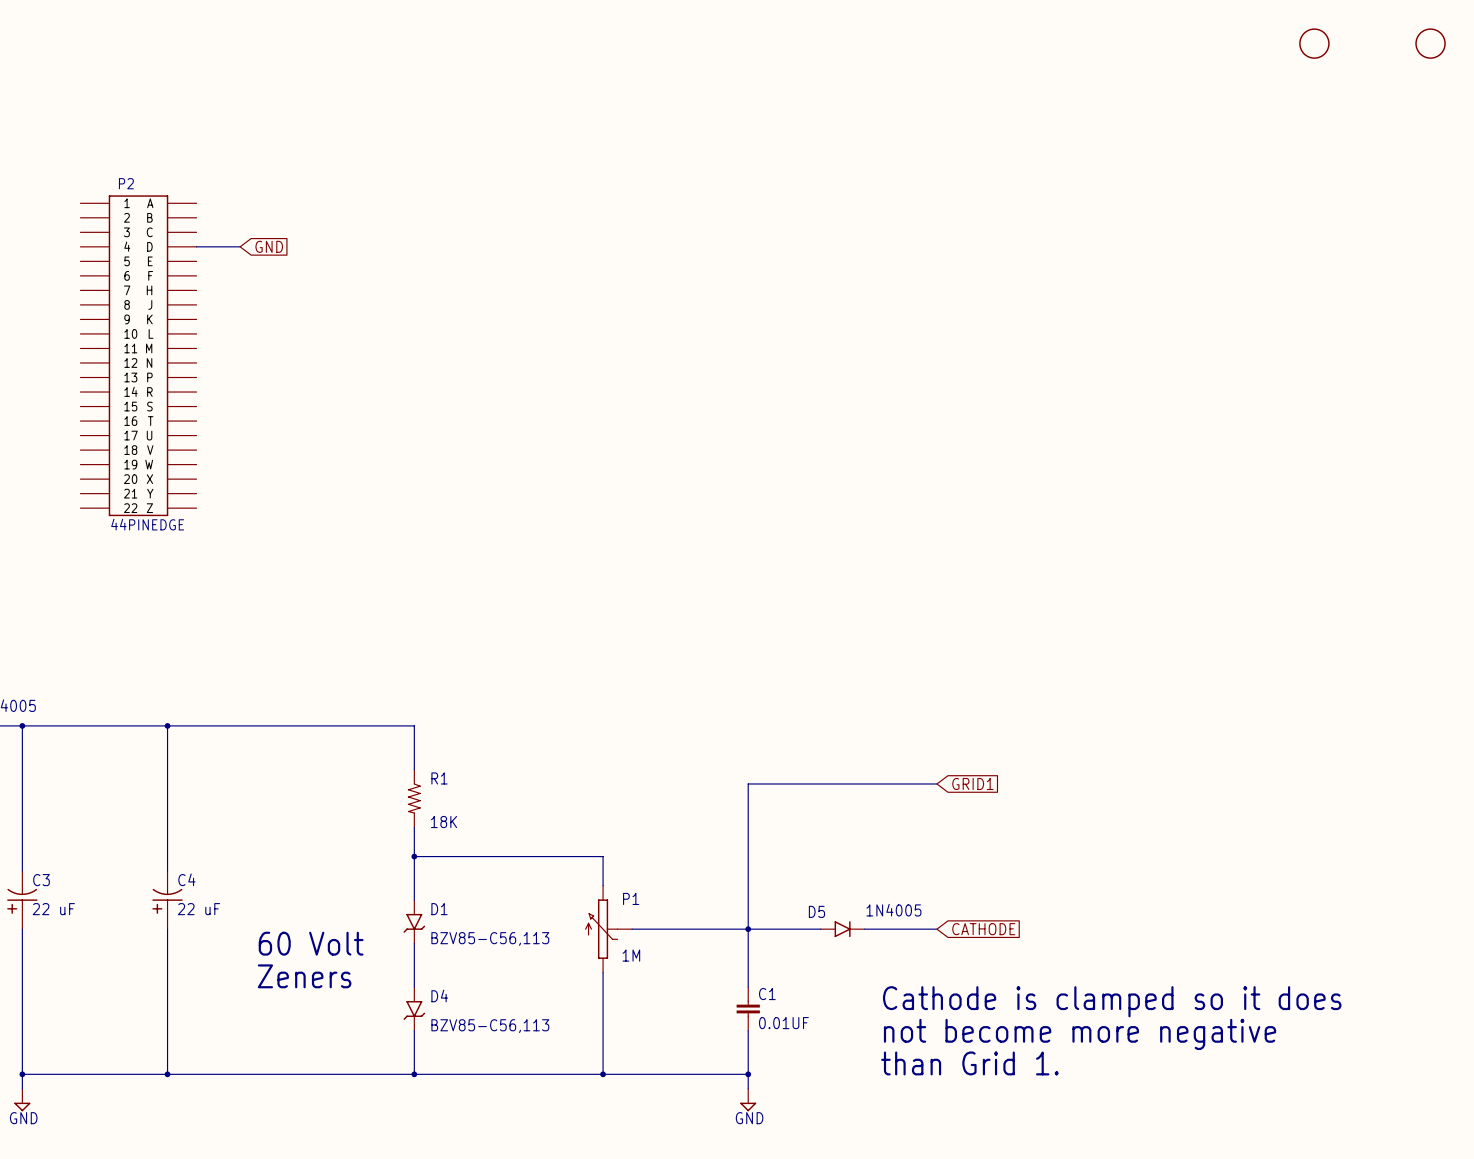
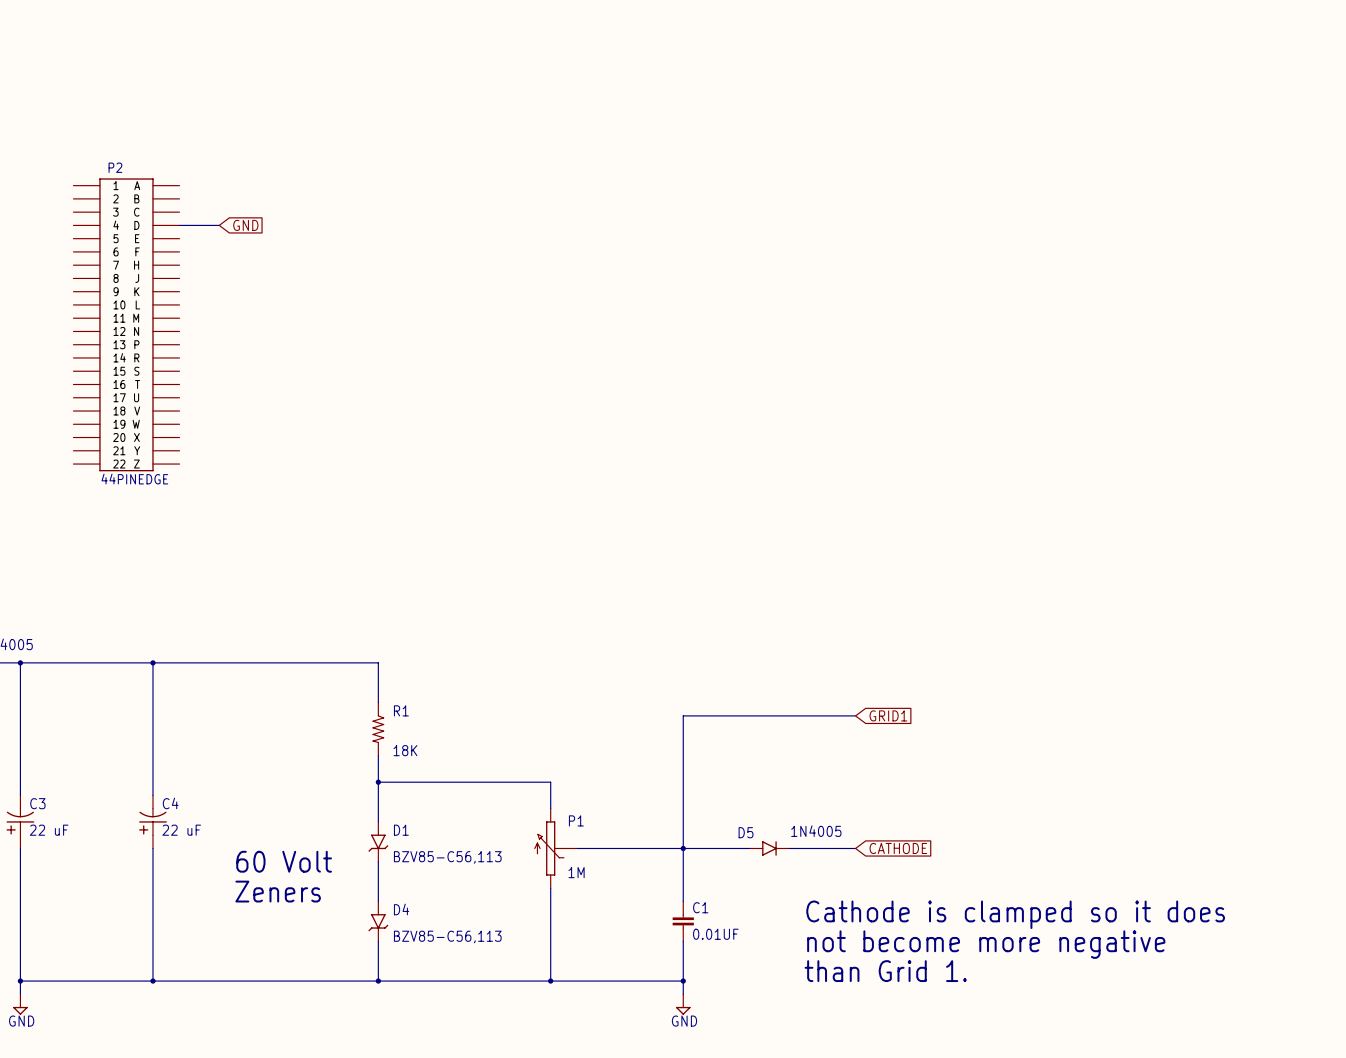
part: (1314, 43) -> none
part: (1430, 43) -> none

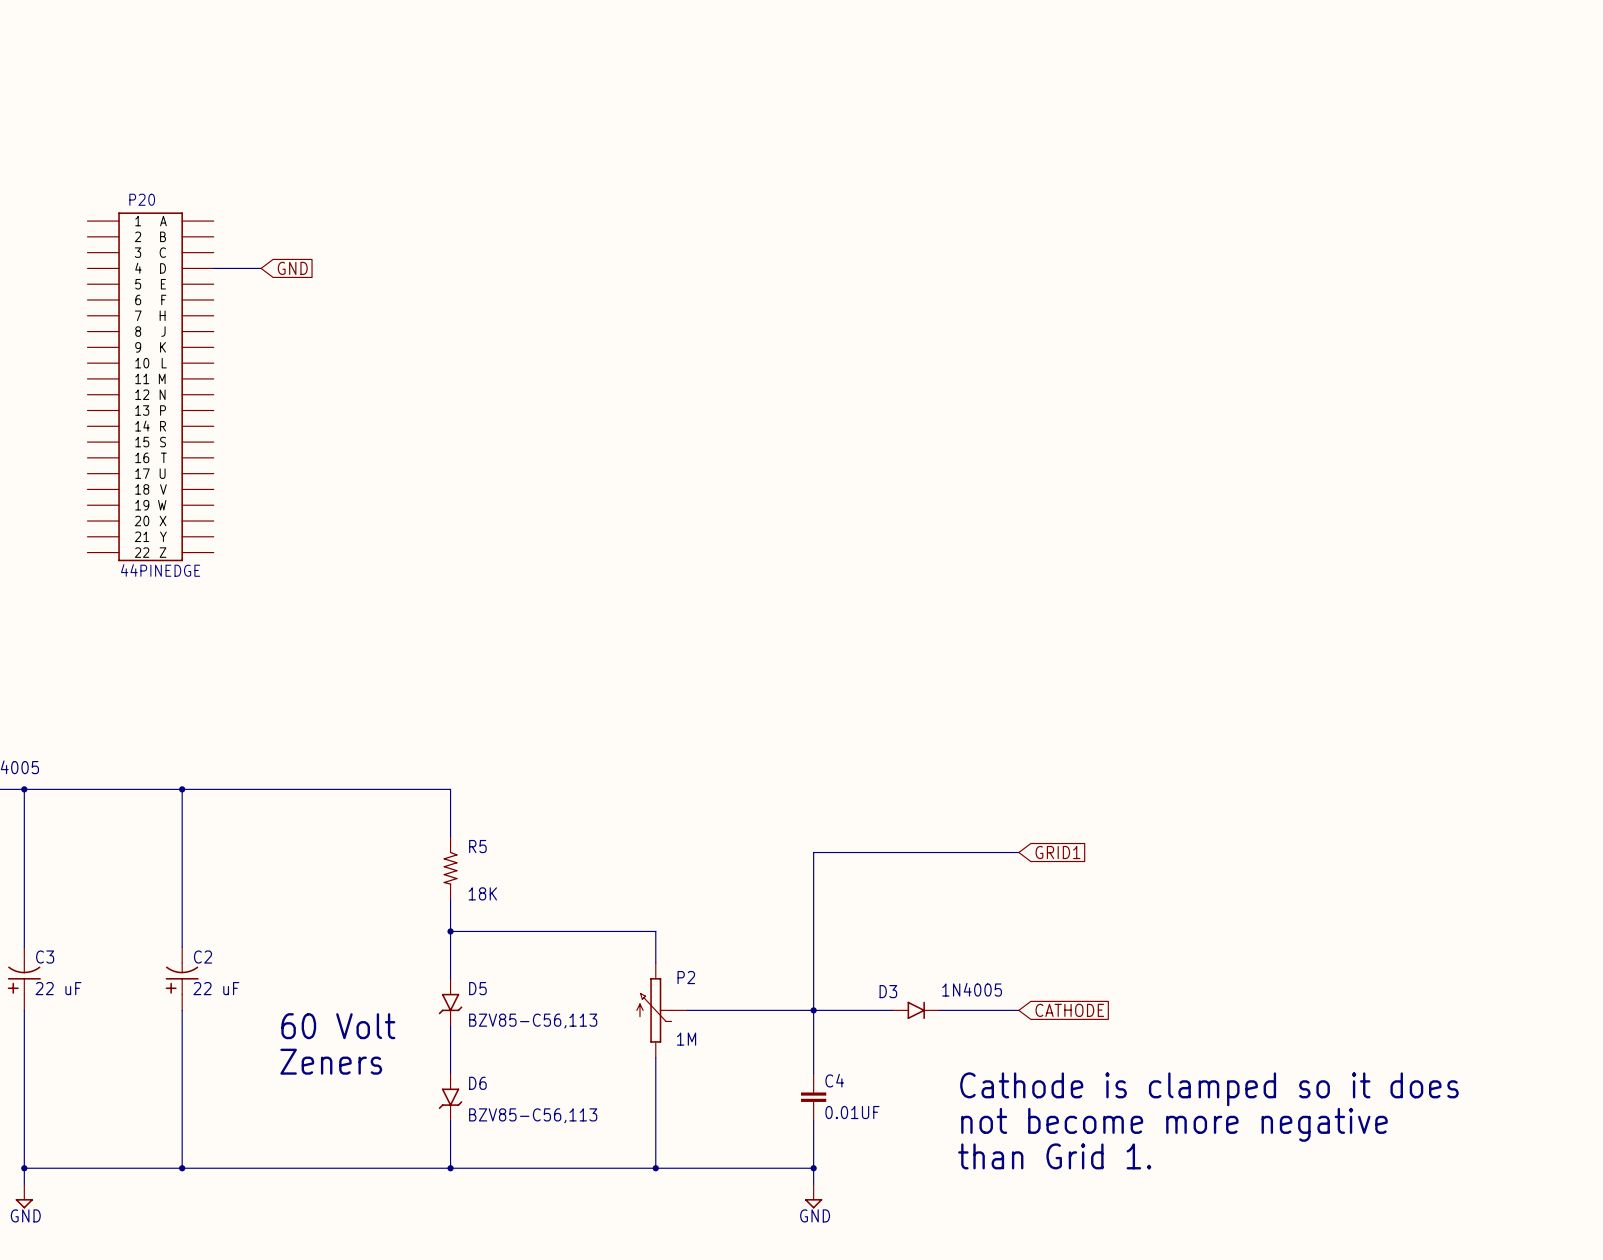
P2 name: P2 (115, 167) -> P20 (142, 199)
R1 name: R1 (401, 710) -> R5 (477, 846)
C4 name: C4 (170, 803) -> C2 (202, 957)
P1 name: P1 (576, 820) -> P2 (686, 977)
D1 name: D1 (401, 830) -> D5 (477, 988)
D5 name: D5 (746, 832) -> D3 (888, 991)
C1 name: C1 (700, 907) -> C4 (834, 1080)
D4 name: D4 (401, 909) -> D6 (477, 1083)

